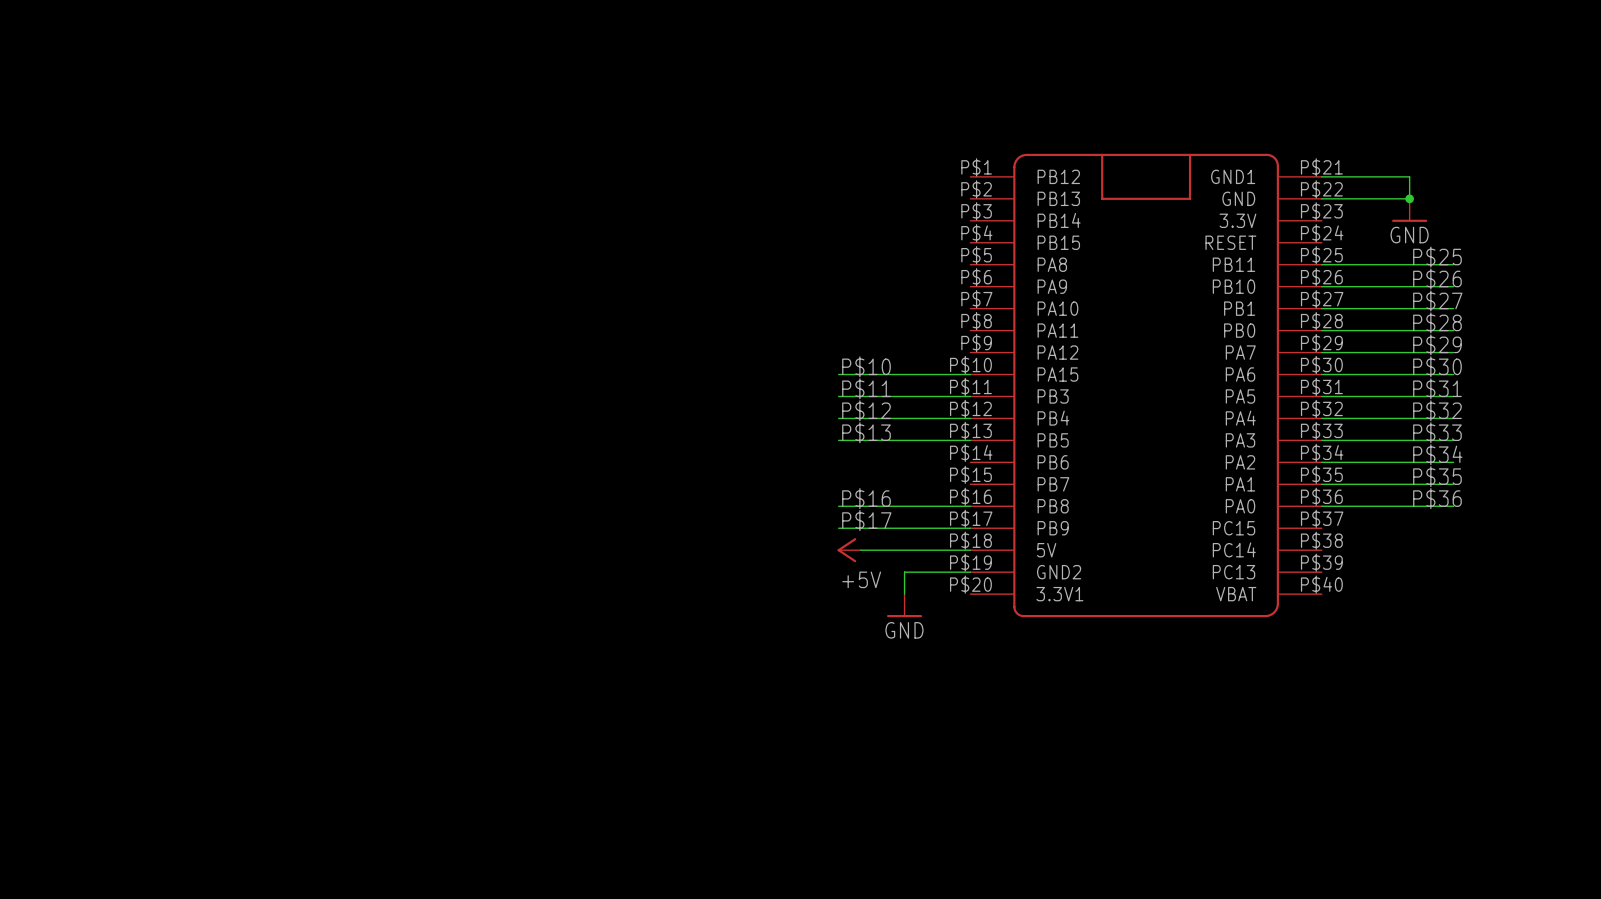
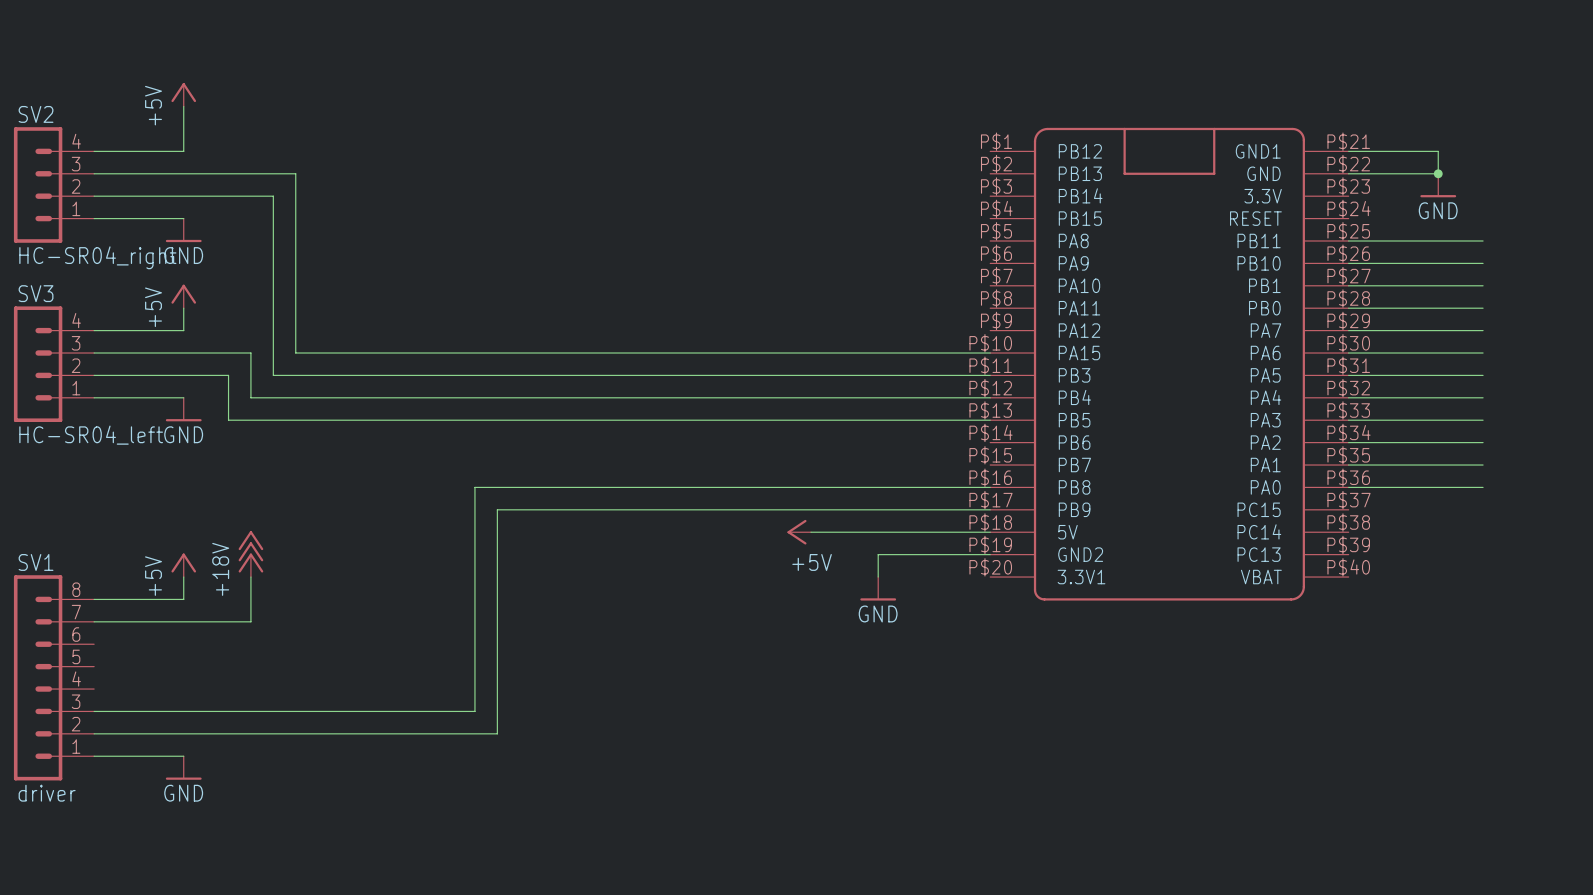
power symbol: none -> +5V (183, 94)
wire: none -> (183, 106) (183, 151) (94, 151)
wire: none -> (94, 173) (295, 173) (295, 353) (855, 353)
SV2: none -> HC-SR04_right (54, 184)
wire: none -> (94, 196) (273, 196) (273, 375) (855, 375)
wire: none -> (94, 218) (183, 218)
power symbol: none -> GND (183, 230)
label: P$25 (1437, 257) -> none
label: P$26 (1437, 278) -> none
label: P$27 (1437, 300) -> none
power symbol: none -> +5V (183, 296)
label: P$28 (1437, 322) -> none
wire: none -> (183, 308) (183, 330) (94, 330)
label: P$29 (1437, 344) -> none
label: P$10 (866, 366) -> none
label: P$30 (1437, 366) -> none
wire: none -> (94, 353) (250, 353) (250, 397) (855, 397)
SV3: none -> HC-SR04_left (54, 364)
label: P$11 (866, 388) -> none
label: P$31 (1437, 388) -> none
wire: none -> (94, 375) (228, 375) (228, 420) (855, 420)
label: P$12 (866, 410) -> none
label: P$32 (1437, 410) -> none
wire: none -> (94, 397) (183, 397)
power symbol: none -> GND (183, 409)
label: P$13 (866, 432) -> none
label: P$33 (1437, 432) -> none
label: P$34 (1437, 454) -> none
label: P$35 (1437, 476) -> none
label: P$16 (866, 498) -> none
label: P$36 (1437, 498) -> none
wire: none -> (855, 487) (474, 487) (474, 711) (94, 711)
label: P$17 (866, 520) -> none
wire: none -> (855, 509) (497, 509) (497, 733) (94, 733)
wire: none -> (811, 532) (878, 532)
power symbol position: +5V (849, 550) -> +5V (799, 532)
power symbol: none -> +18V (250, 554)
wire: (904, 572) (904, 594) -> (923, 554) (878, 554) (878, 577)
power symbol: none -> +5V (183, 565)
wire: none -> (183, 577) (183, 599) (94, 599)
wire: none -> (250, 577) (250, 621) (94, 621)
power symbol position: GND (904, 605) -> GND (878, 588)
SV1: none -> driver (54, 677)
wire: none -> (94, 756) (183, 756)
power symbol: none -> GND (183, 768)

